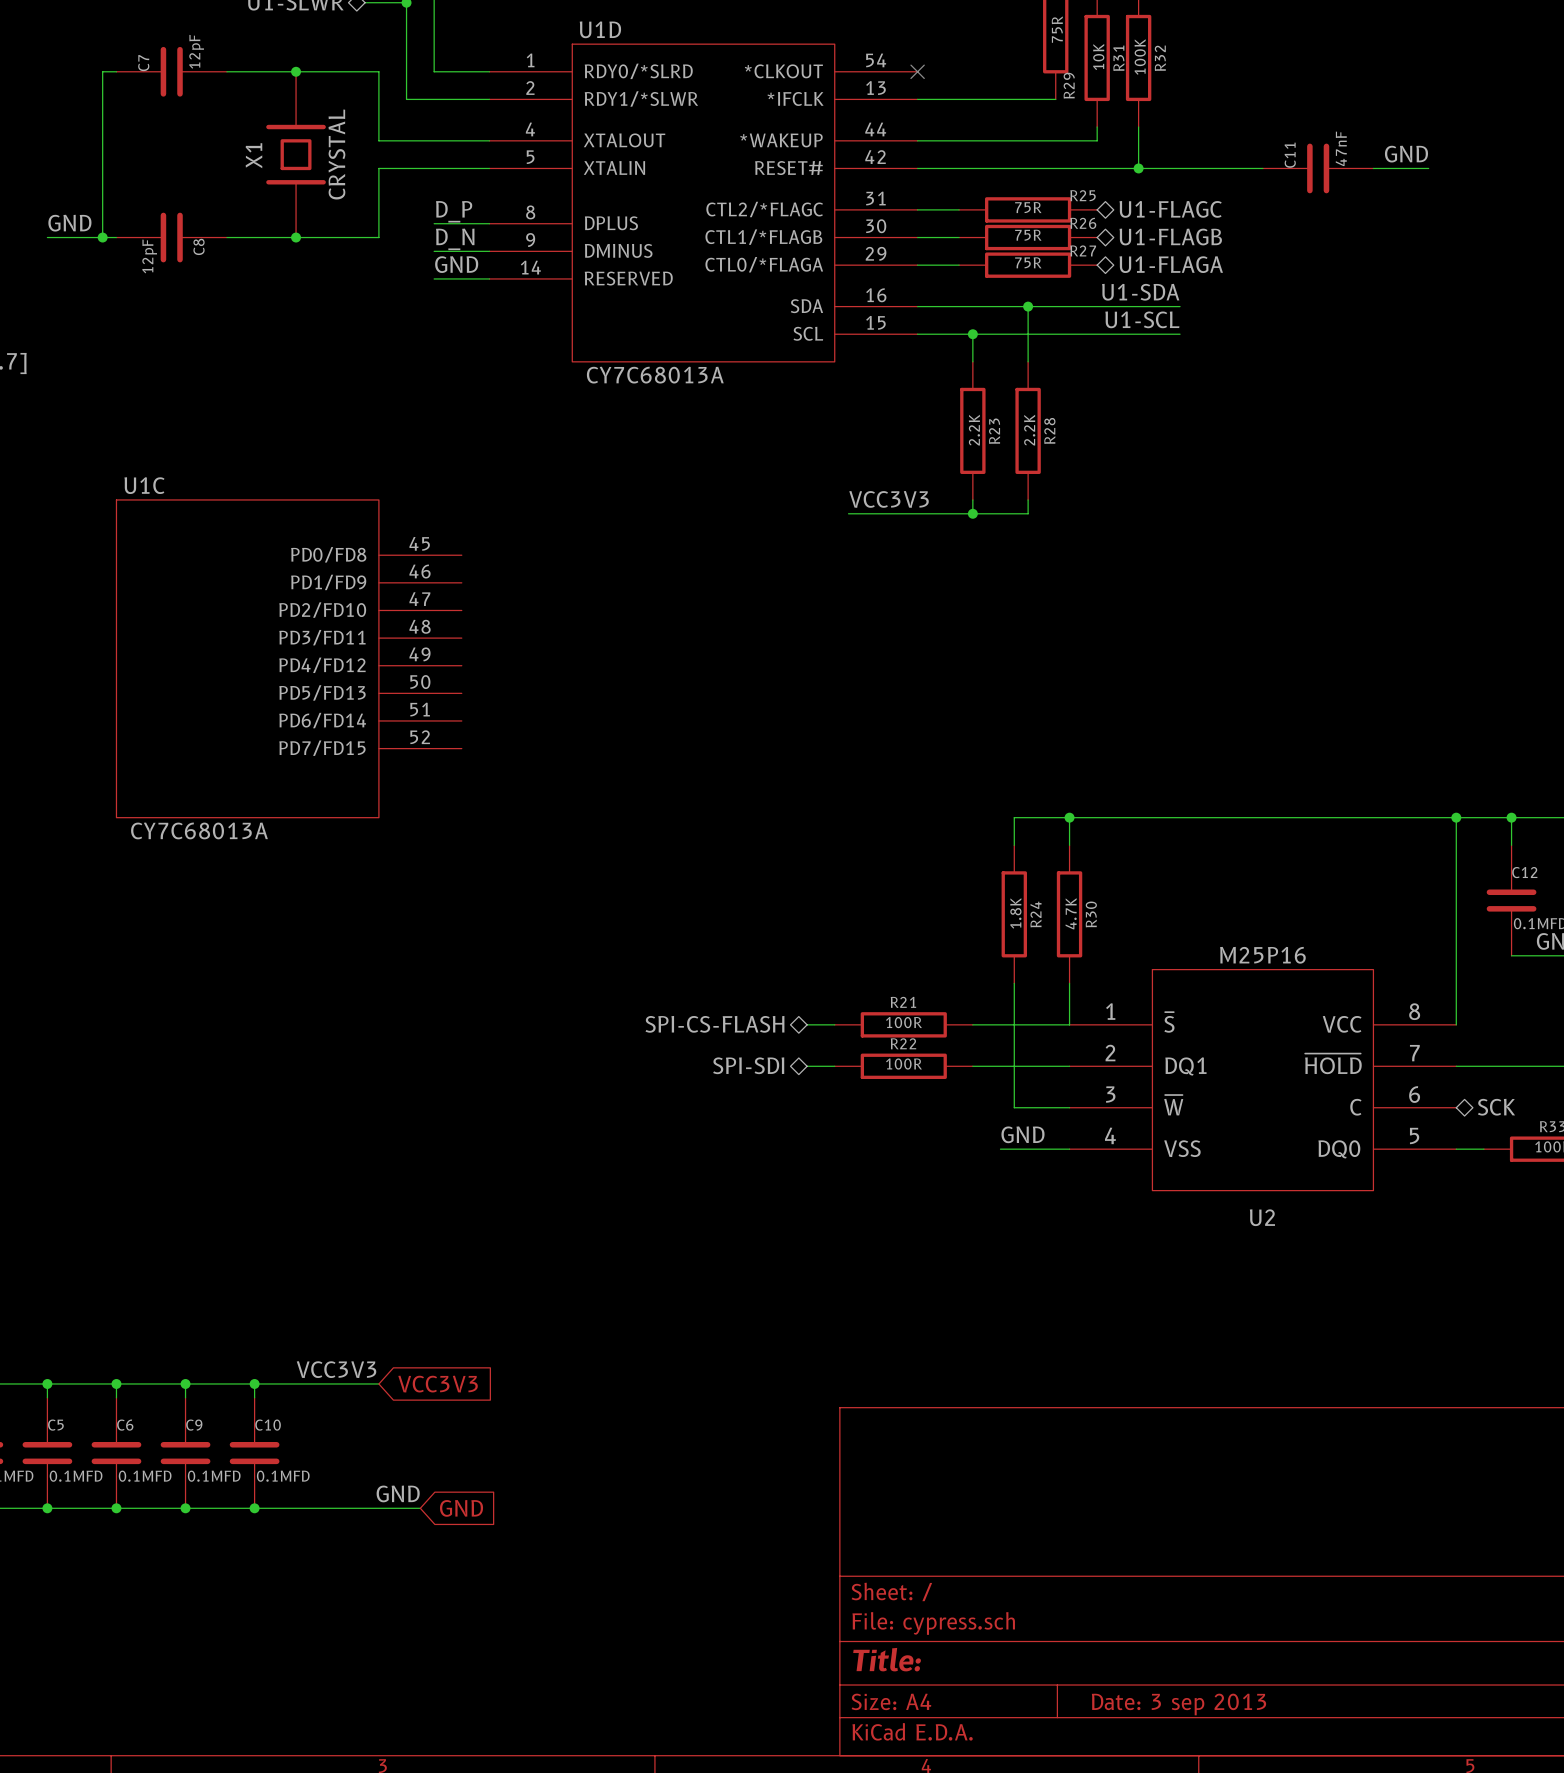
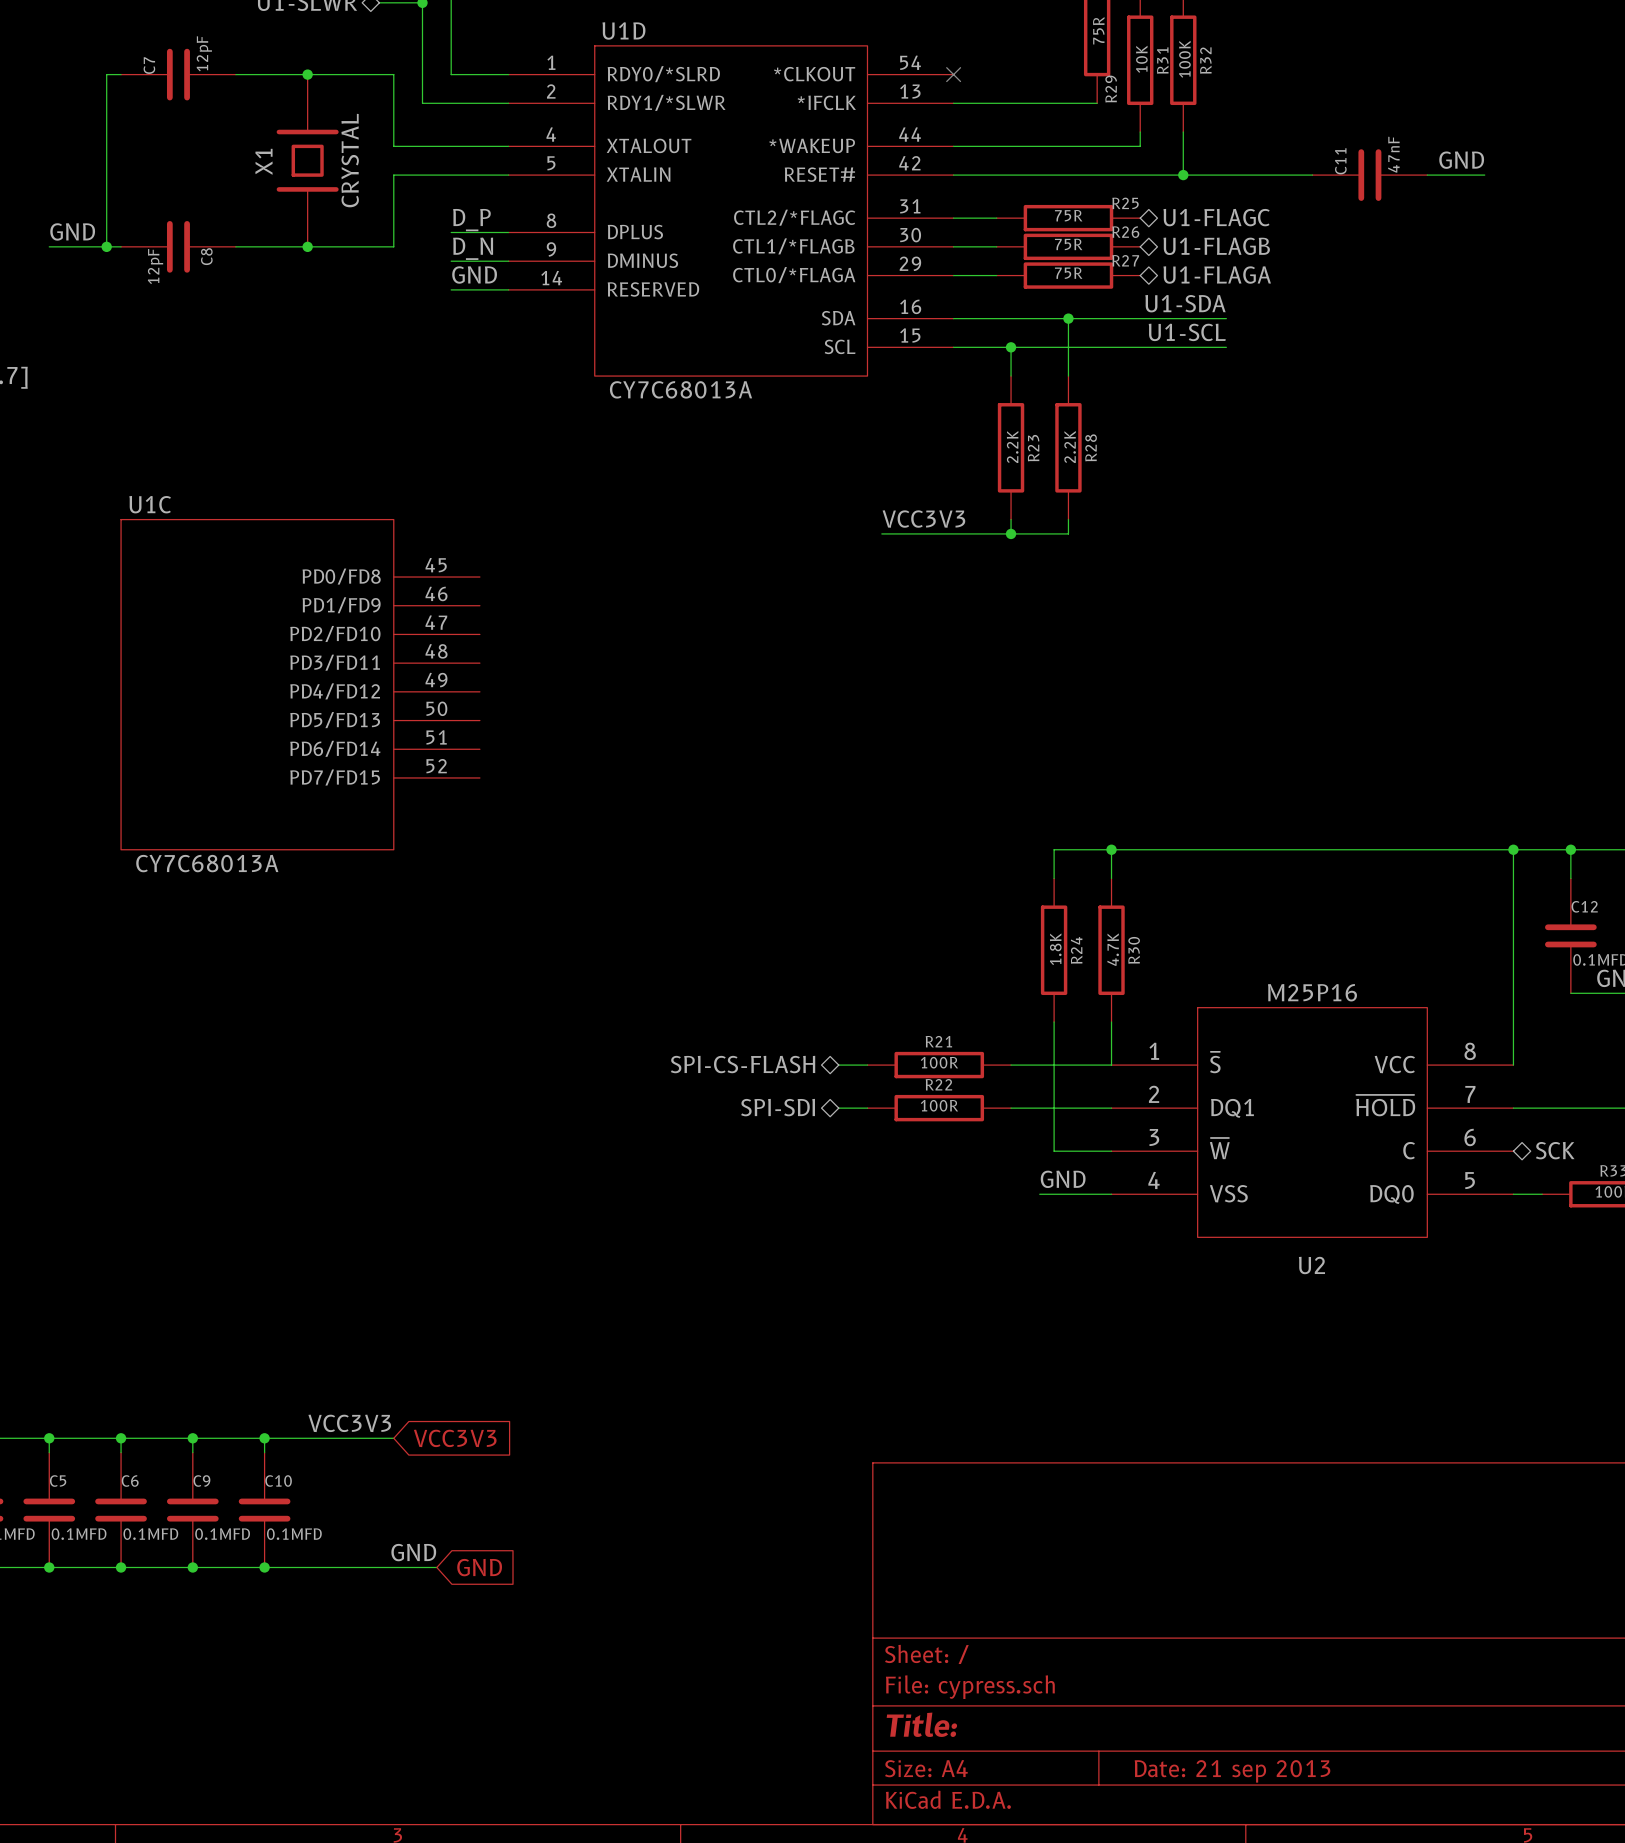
title block: Date: 3 sep 2013 (1178, 1704) -> Date: 21 sep 2013 (1232, 1771)

